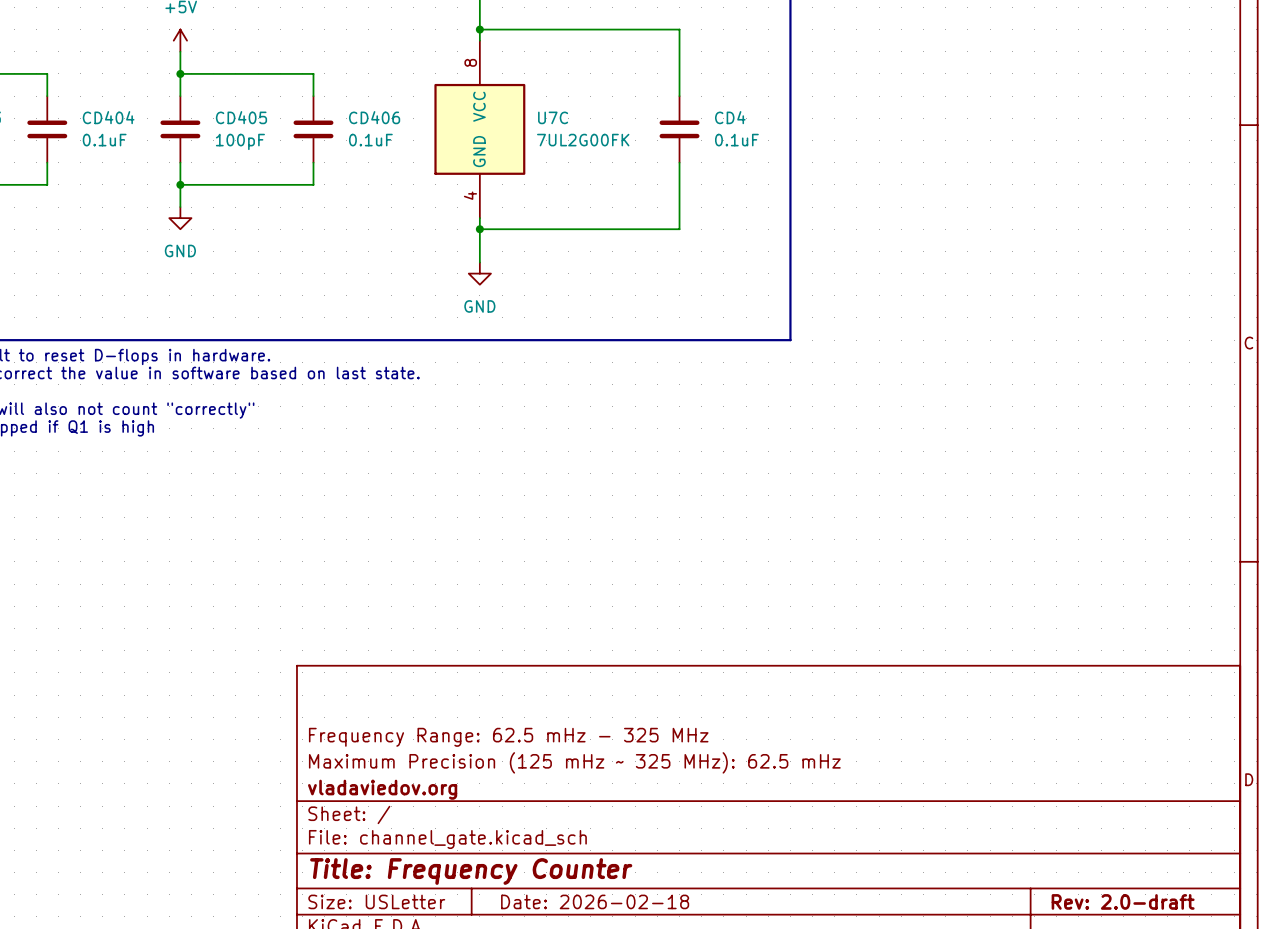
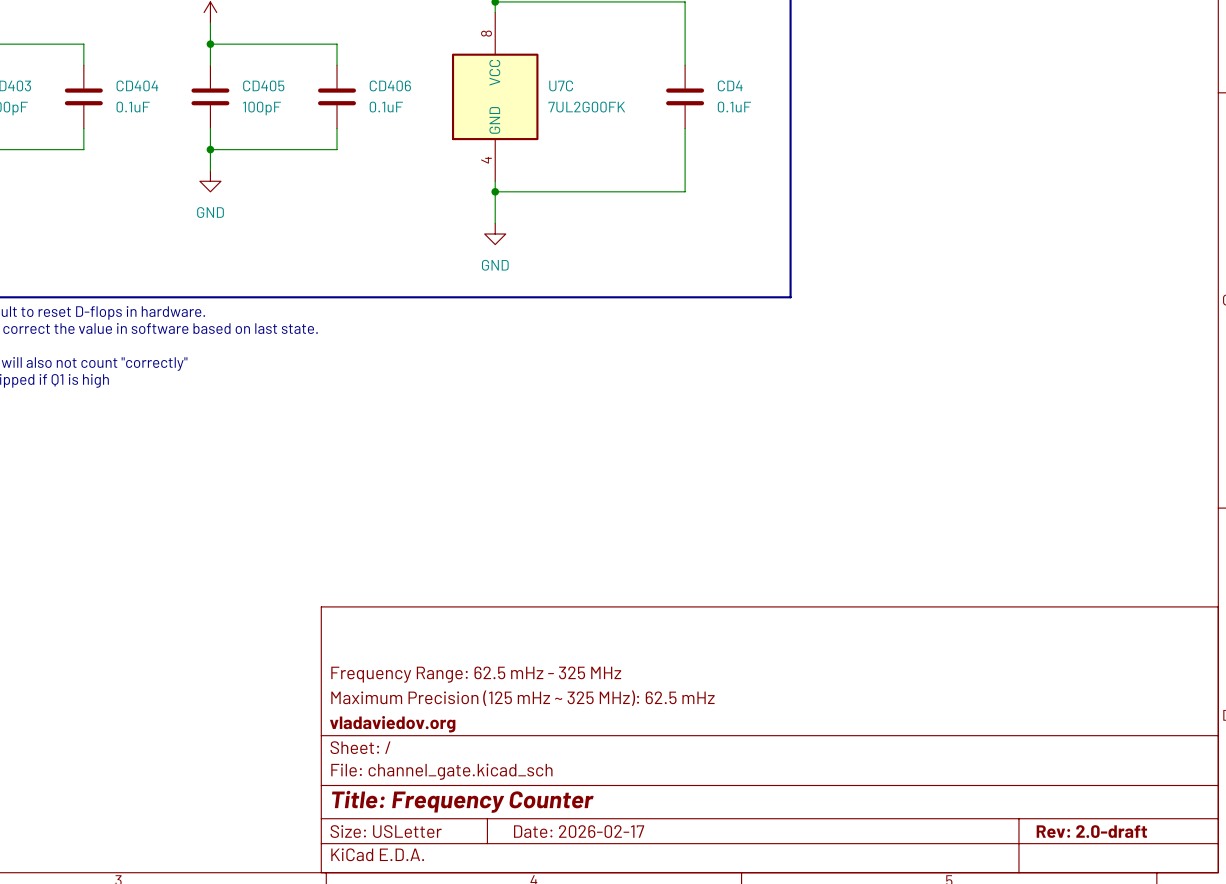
title block: Date: 2026-02-18 (595, 901) -> Date: 2026-02-17 (579, 831)

